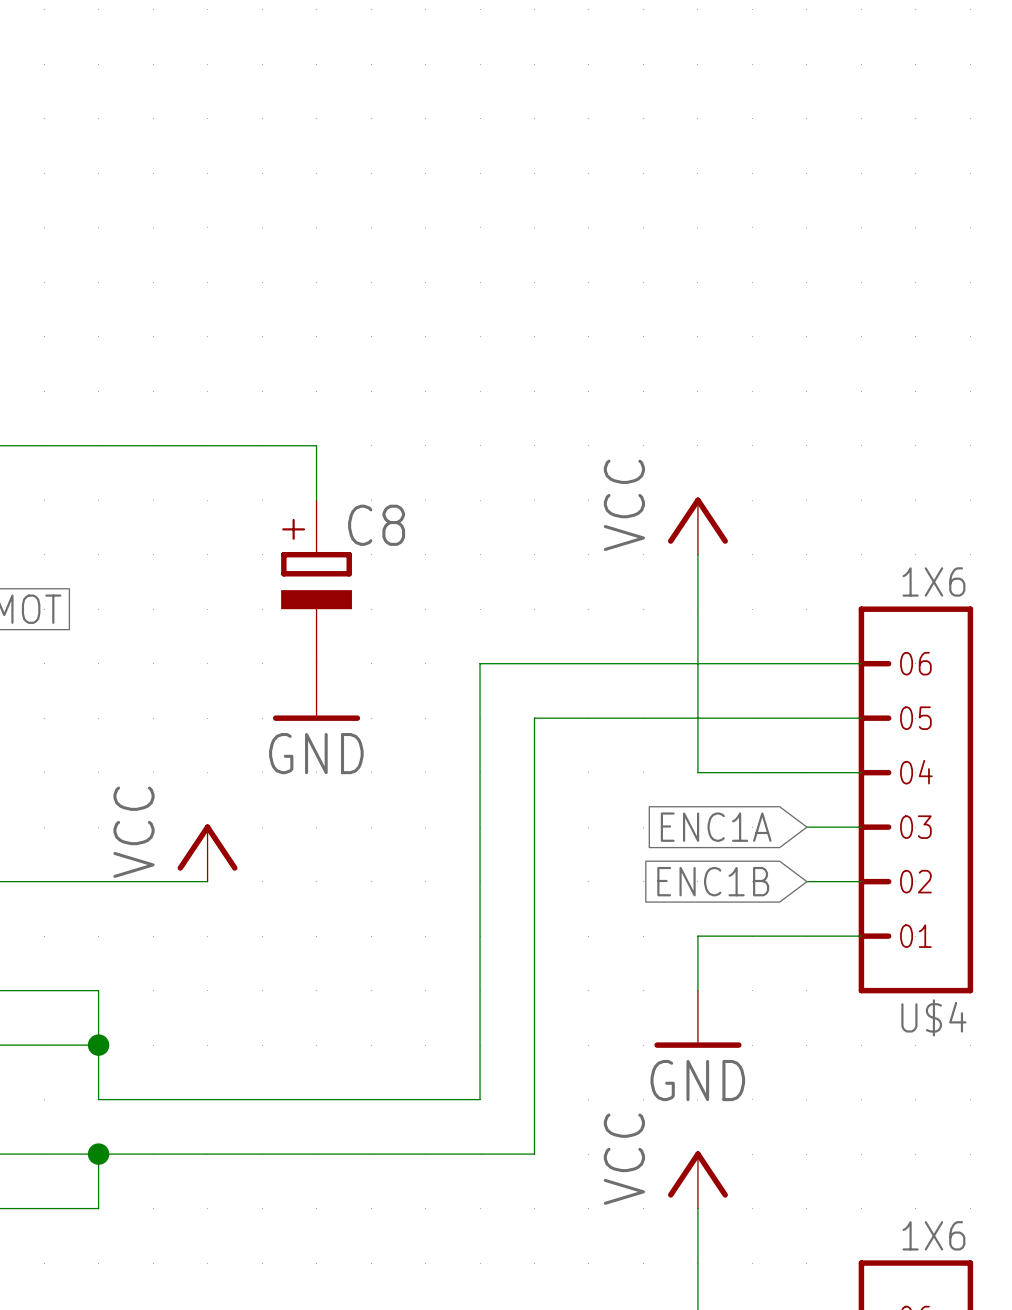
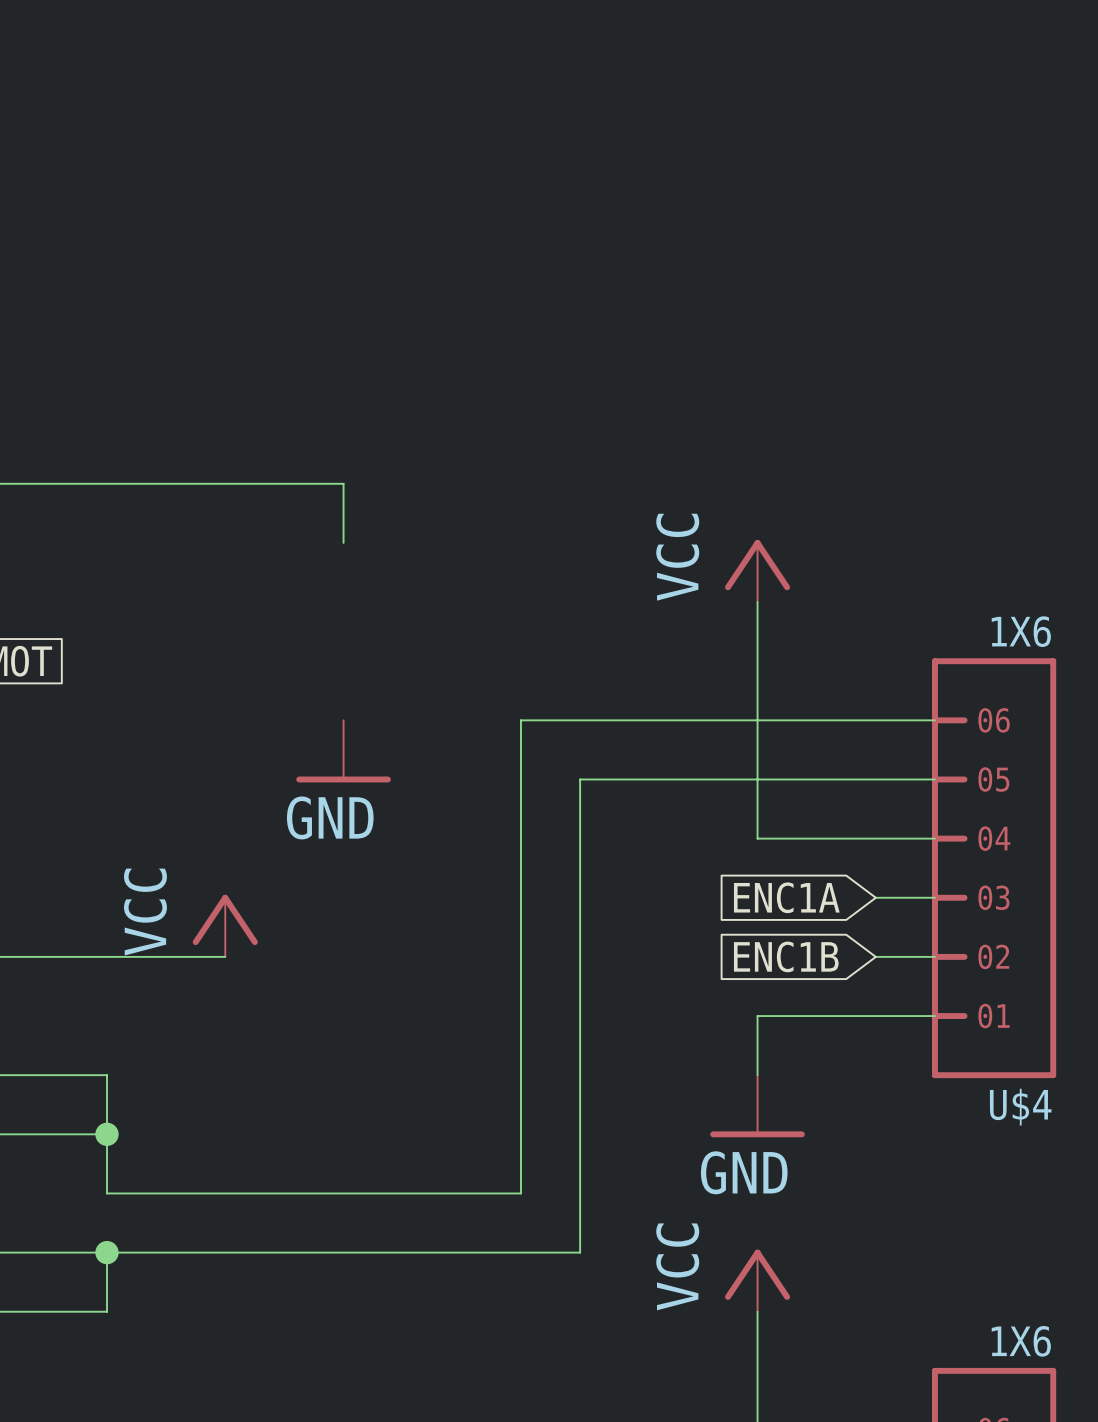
C8: (316, 581) -> none

